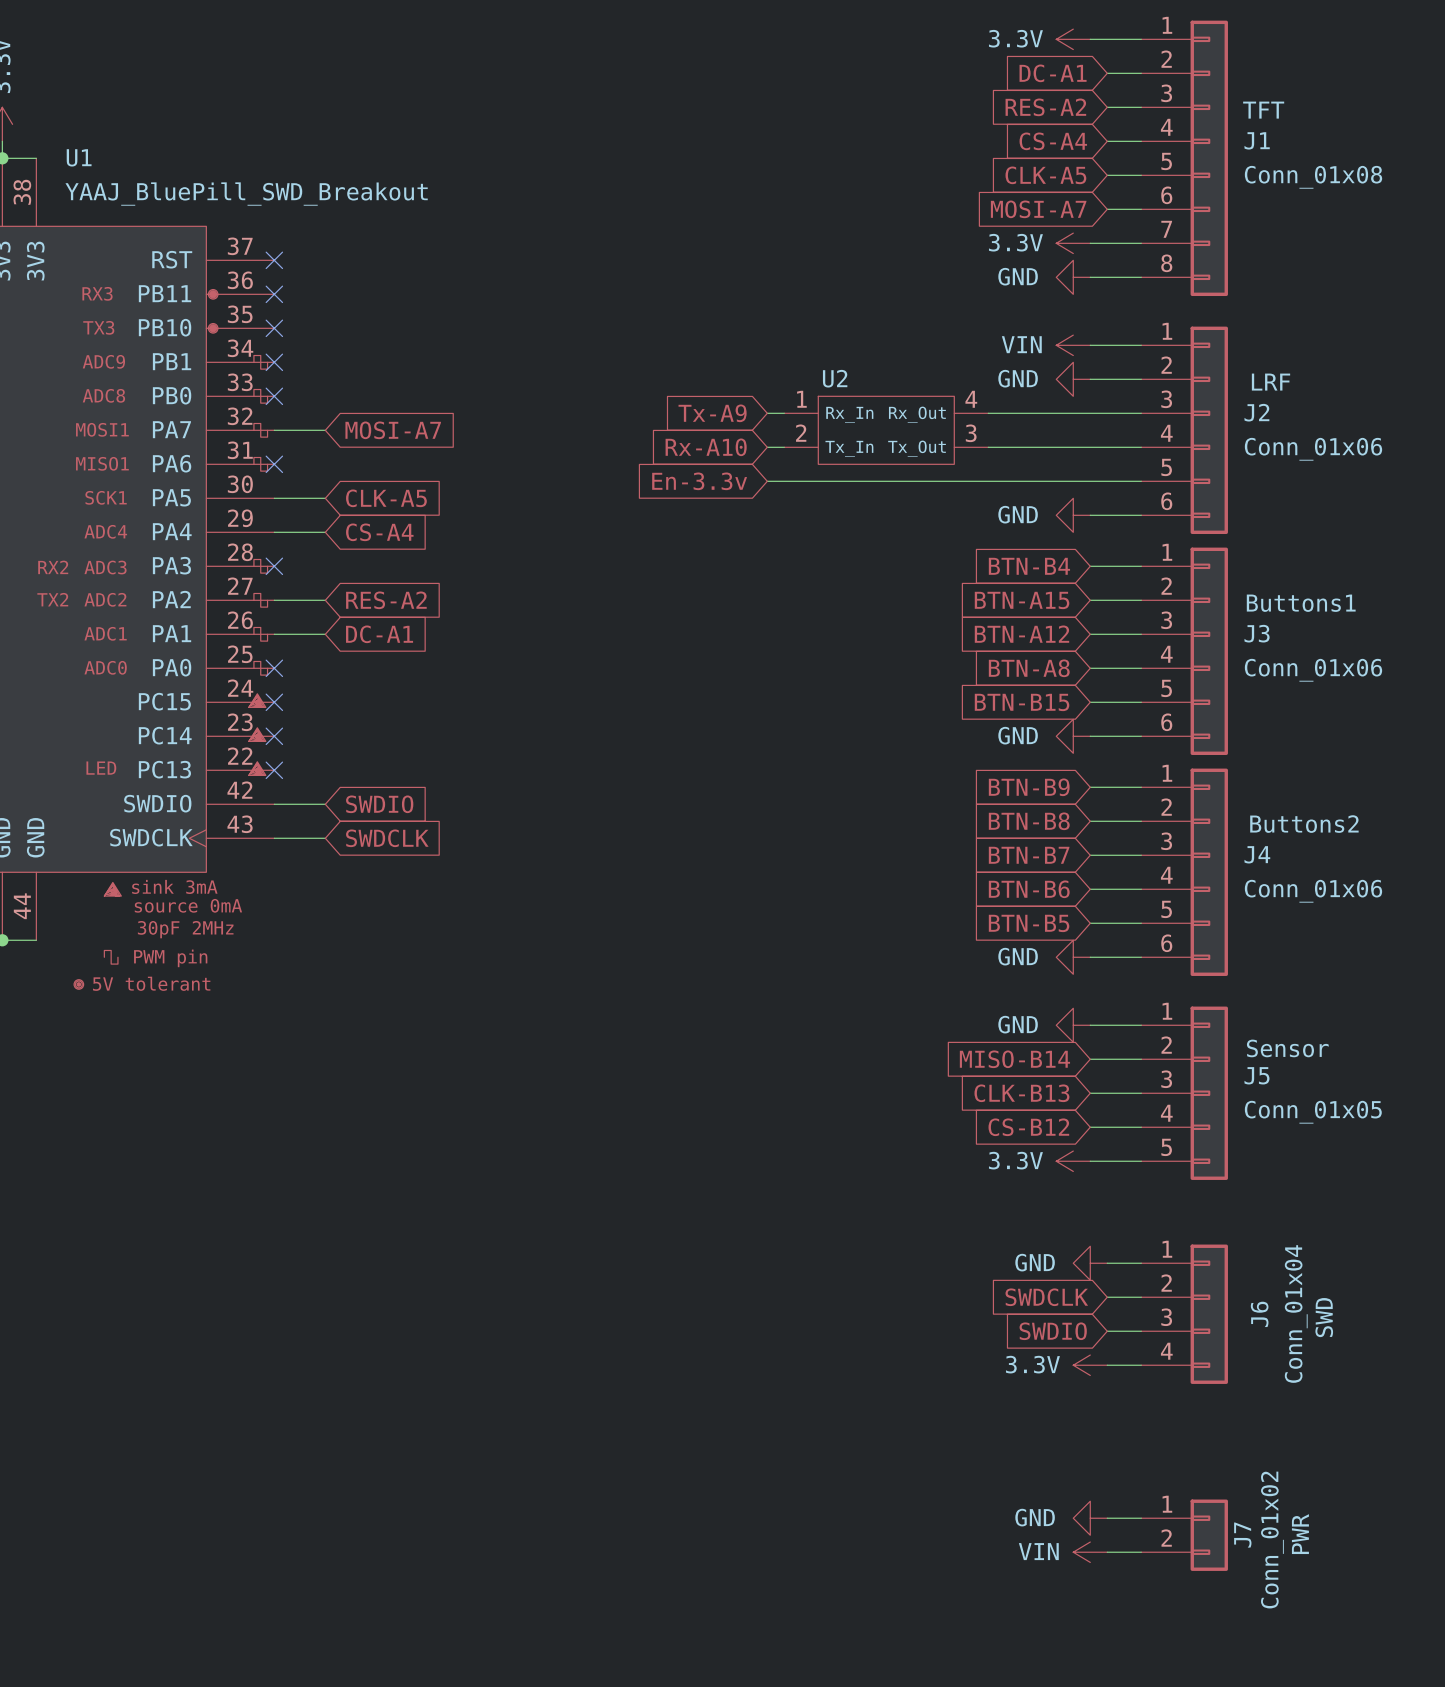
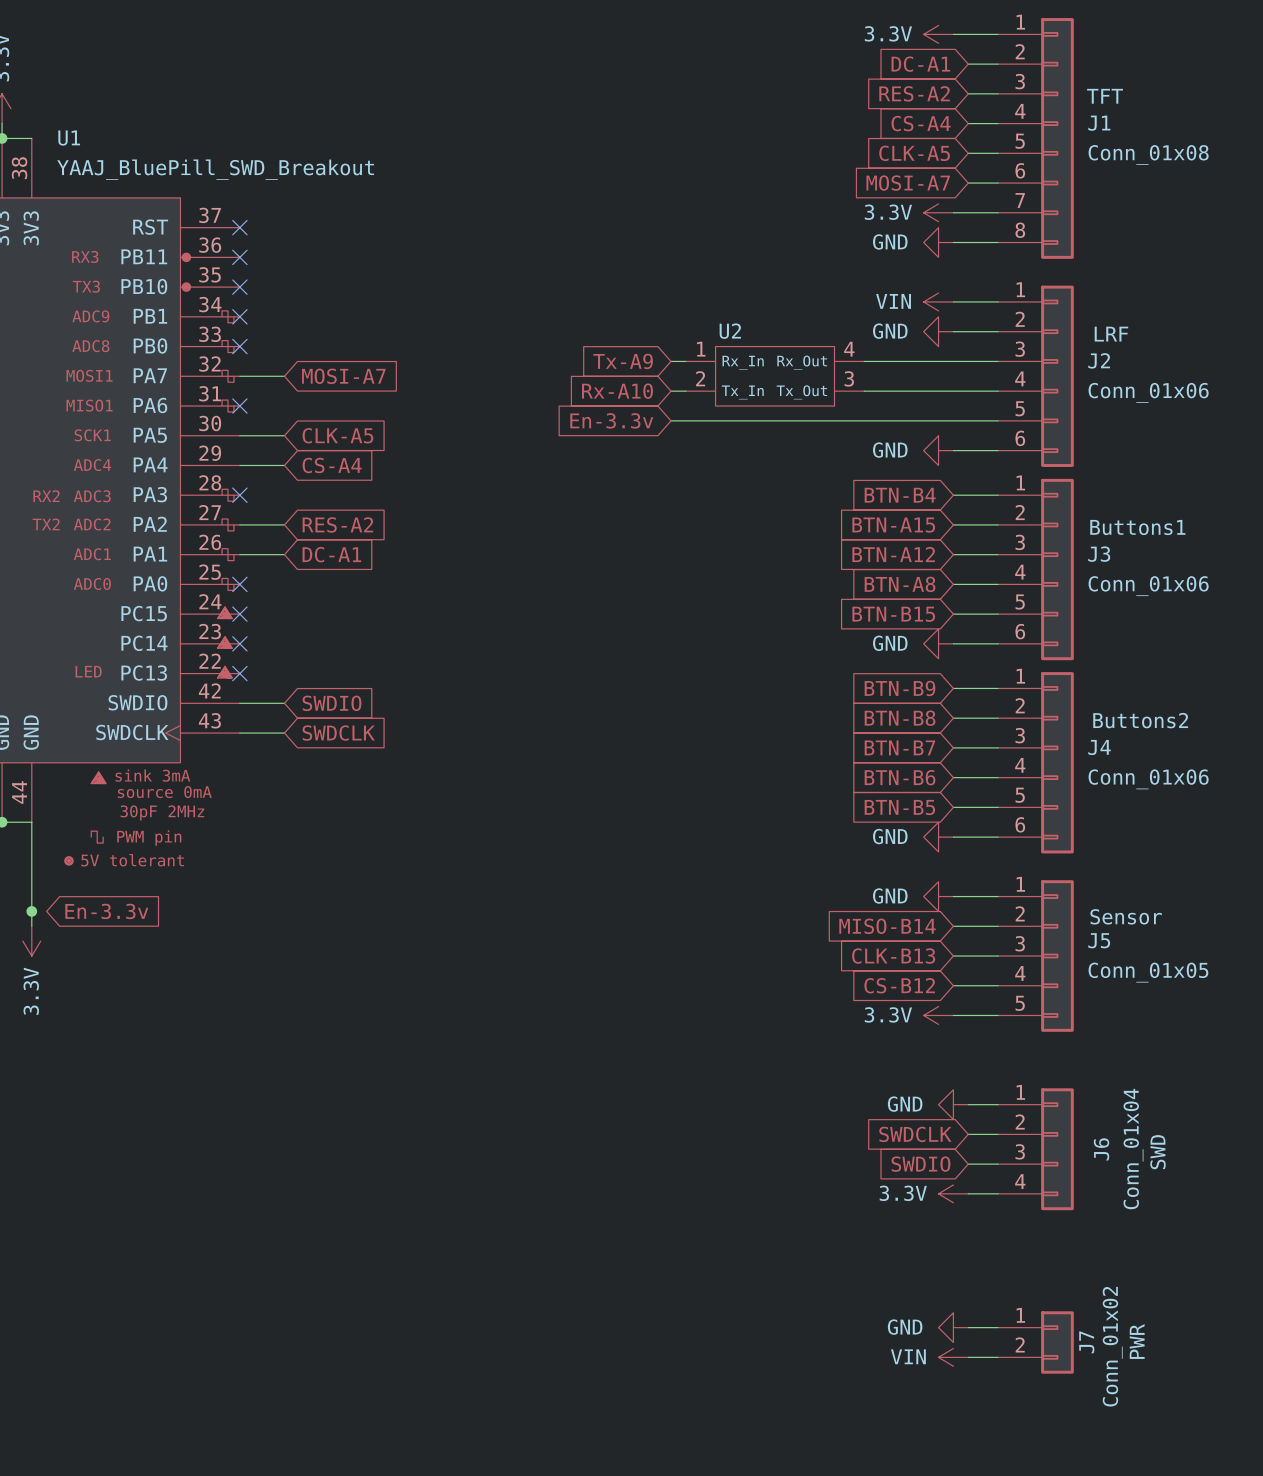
wire: none -> (31, 822) (31, 926)
junction: none -> (31, 911)
global label: none -> En-3.3v (106, 911)
power symbol: none -> 3.3V (31, 941)

